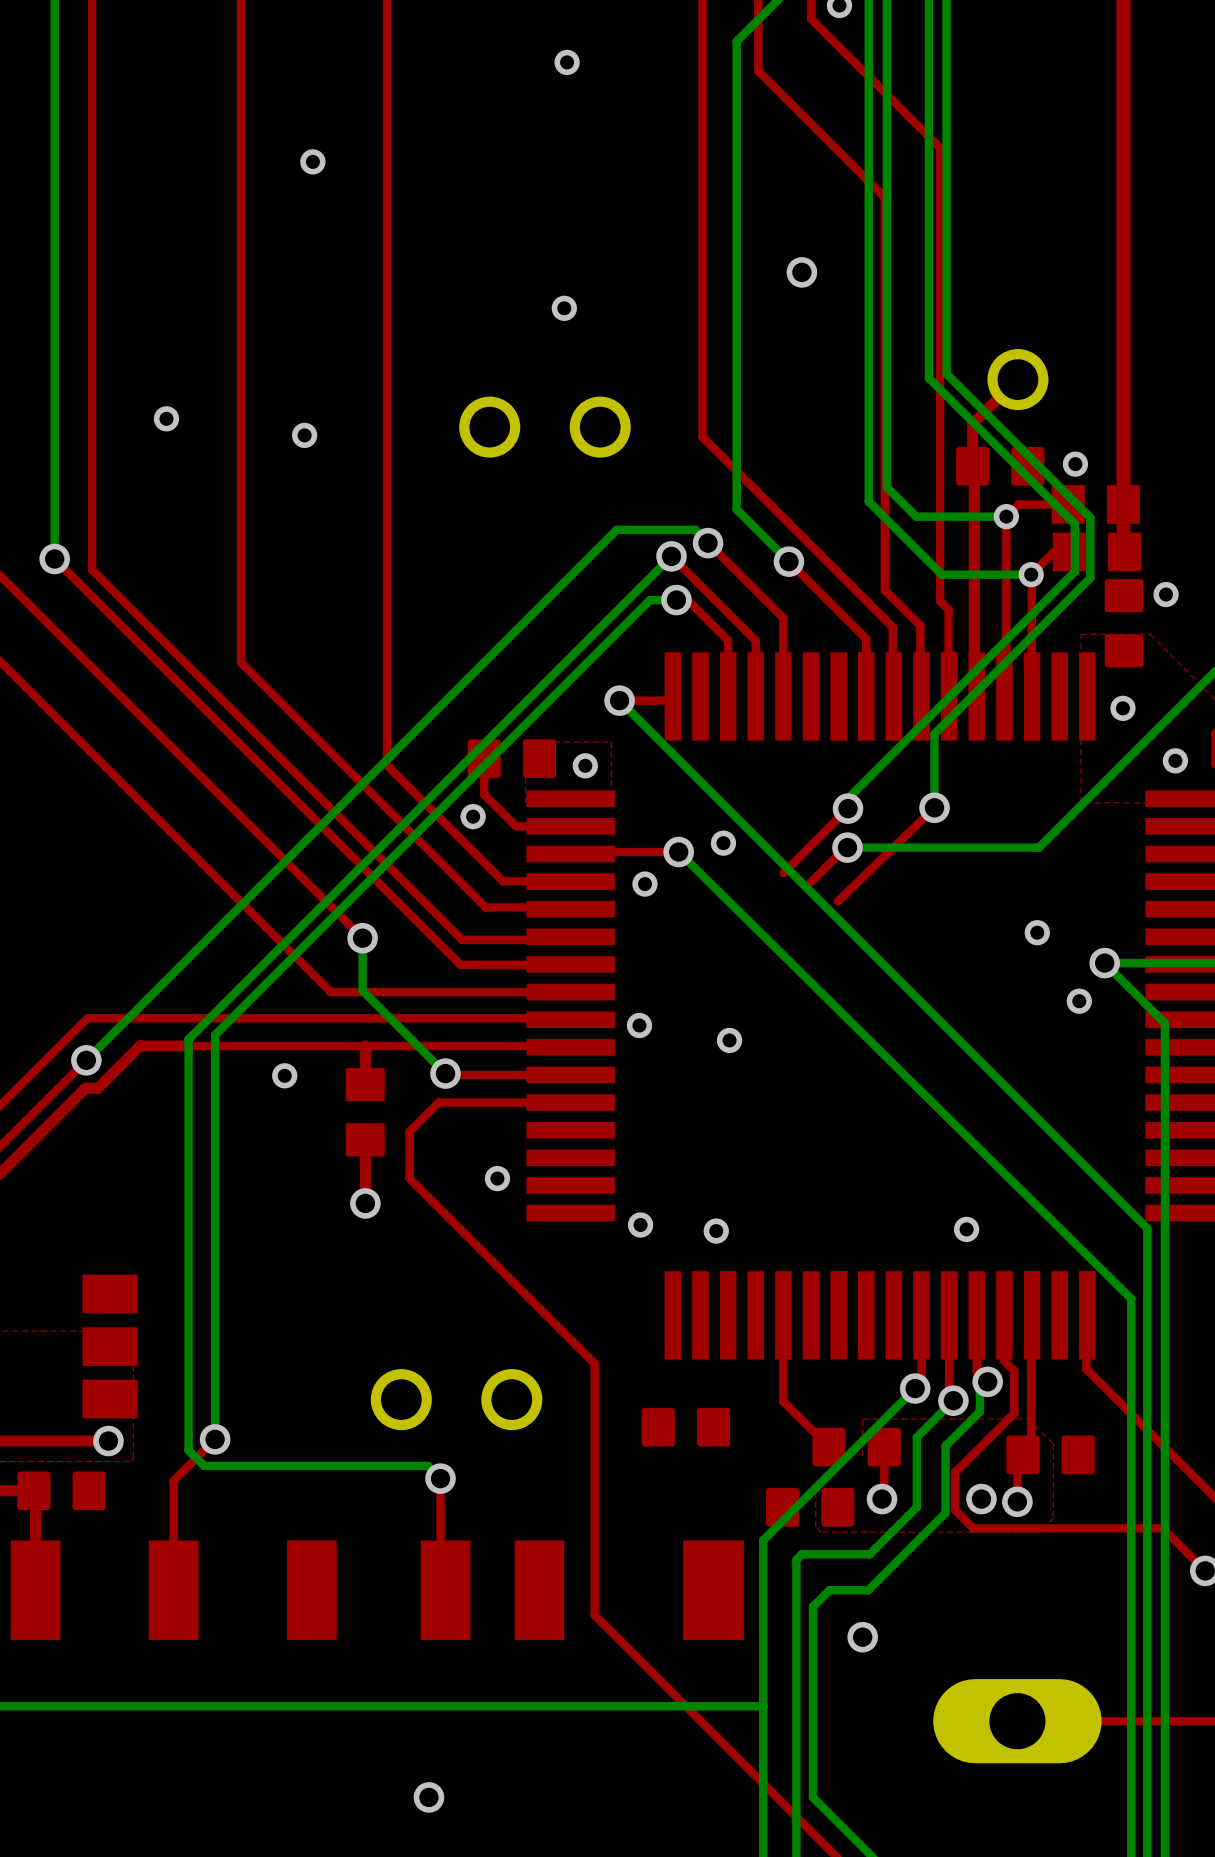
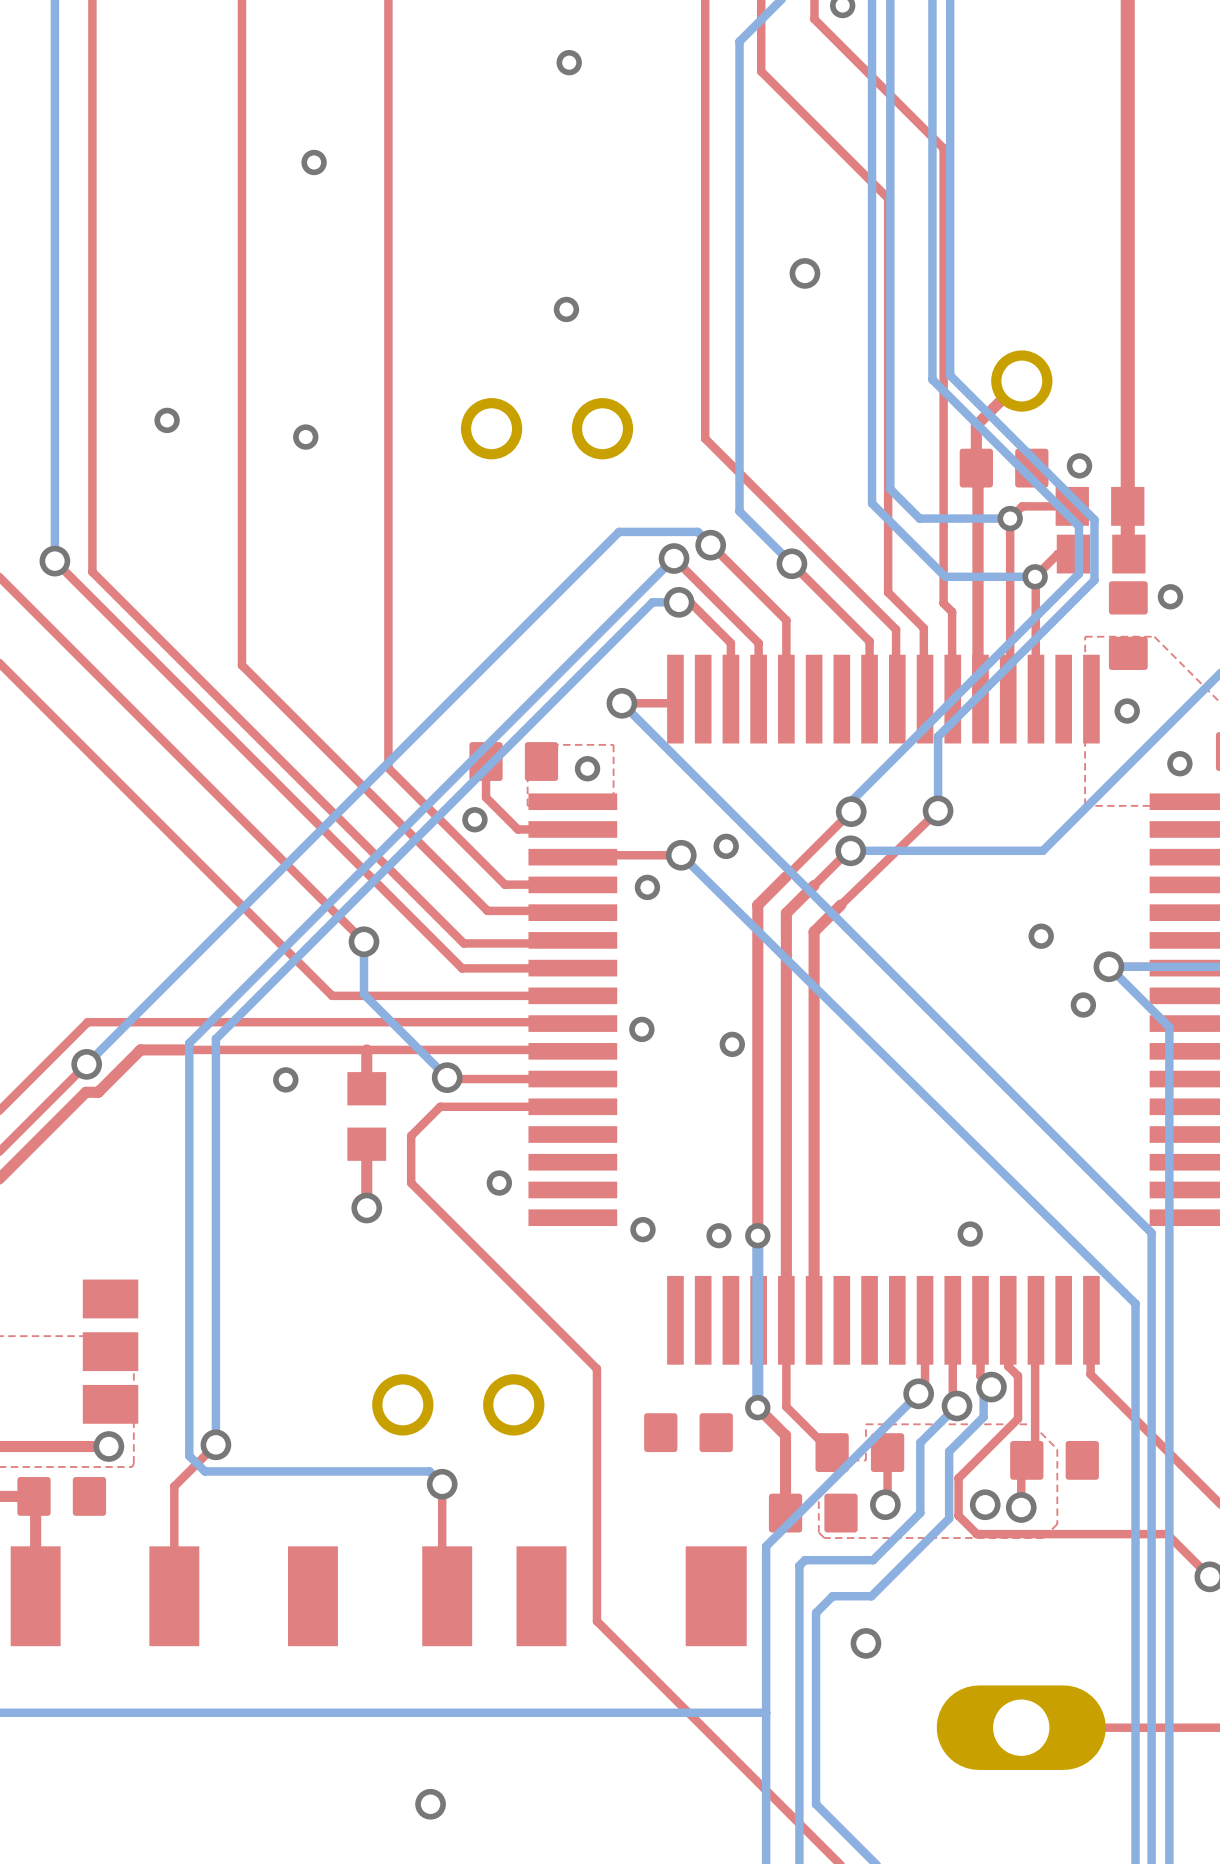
top track: none -> (786, 876) (757, 905) (757, 1235)
top track: none -> (814, 885) (786, 913) (786, 1320)
top track: none -> (841, 904) (814, 931) (814, 1320)
via position: (716, 1231) -> (757, 1235)
bottom track: none -> (757, 1235) (757, 1407)
top track: none -> (757, 1407) (785, 1435) (785, 1513)
via: none -> (757, 1407)

